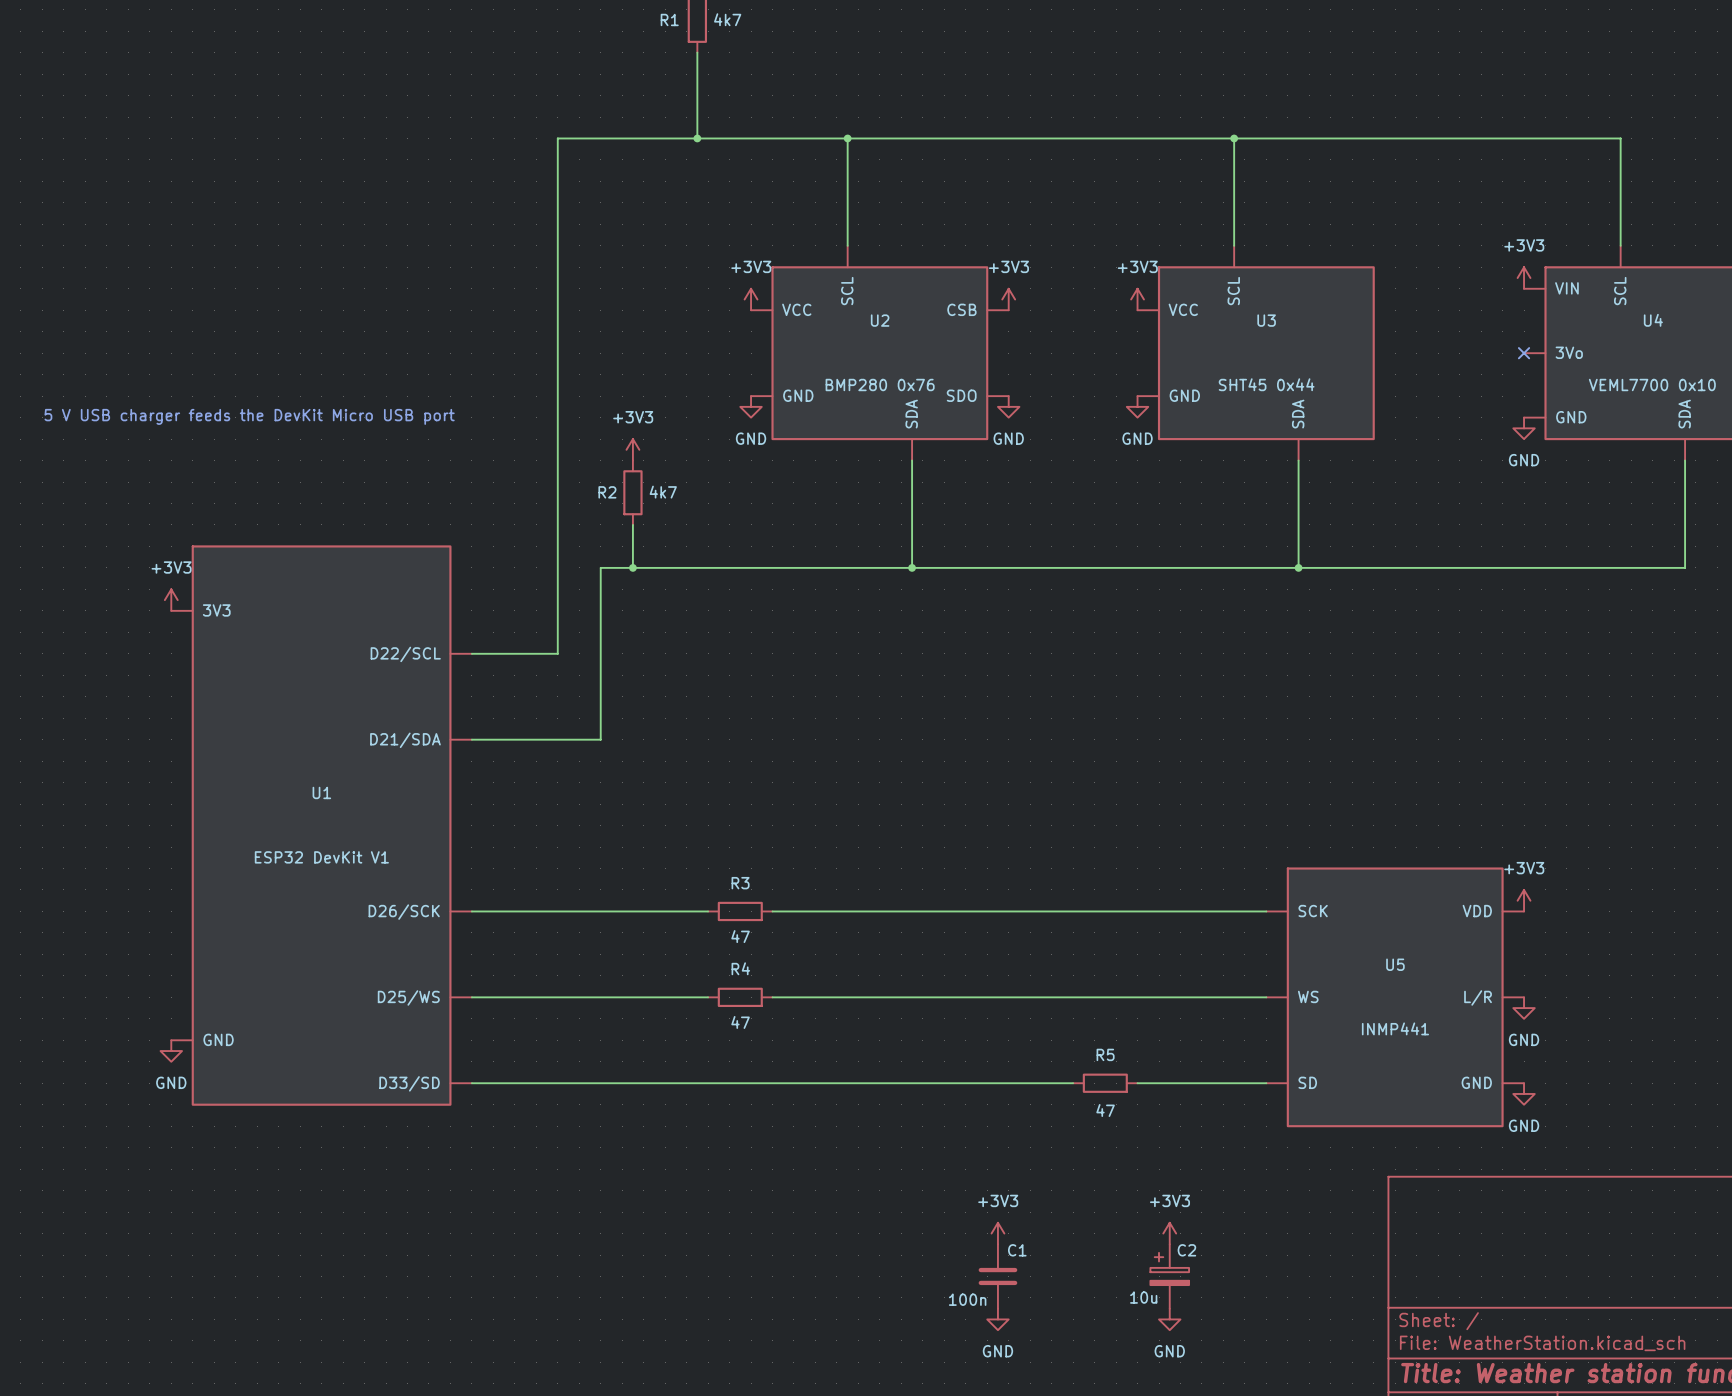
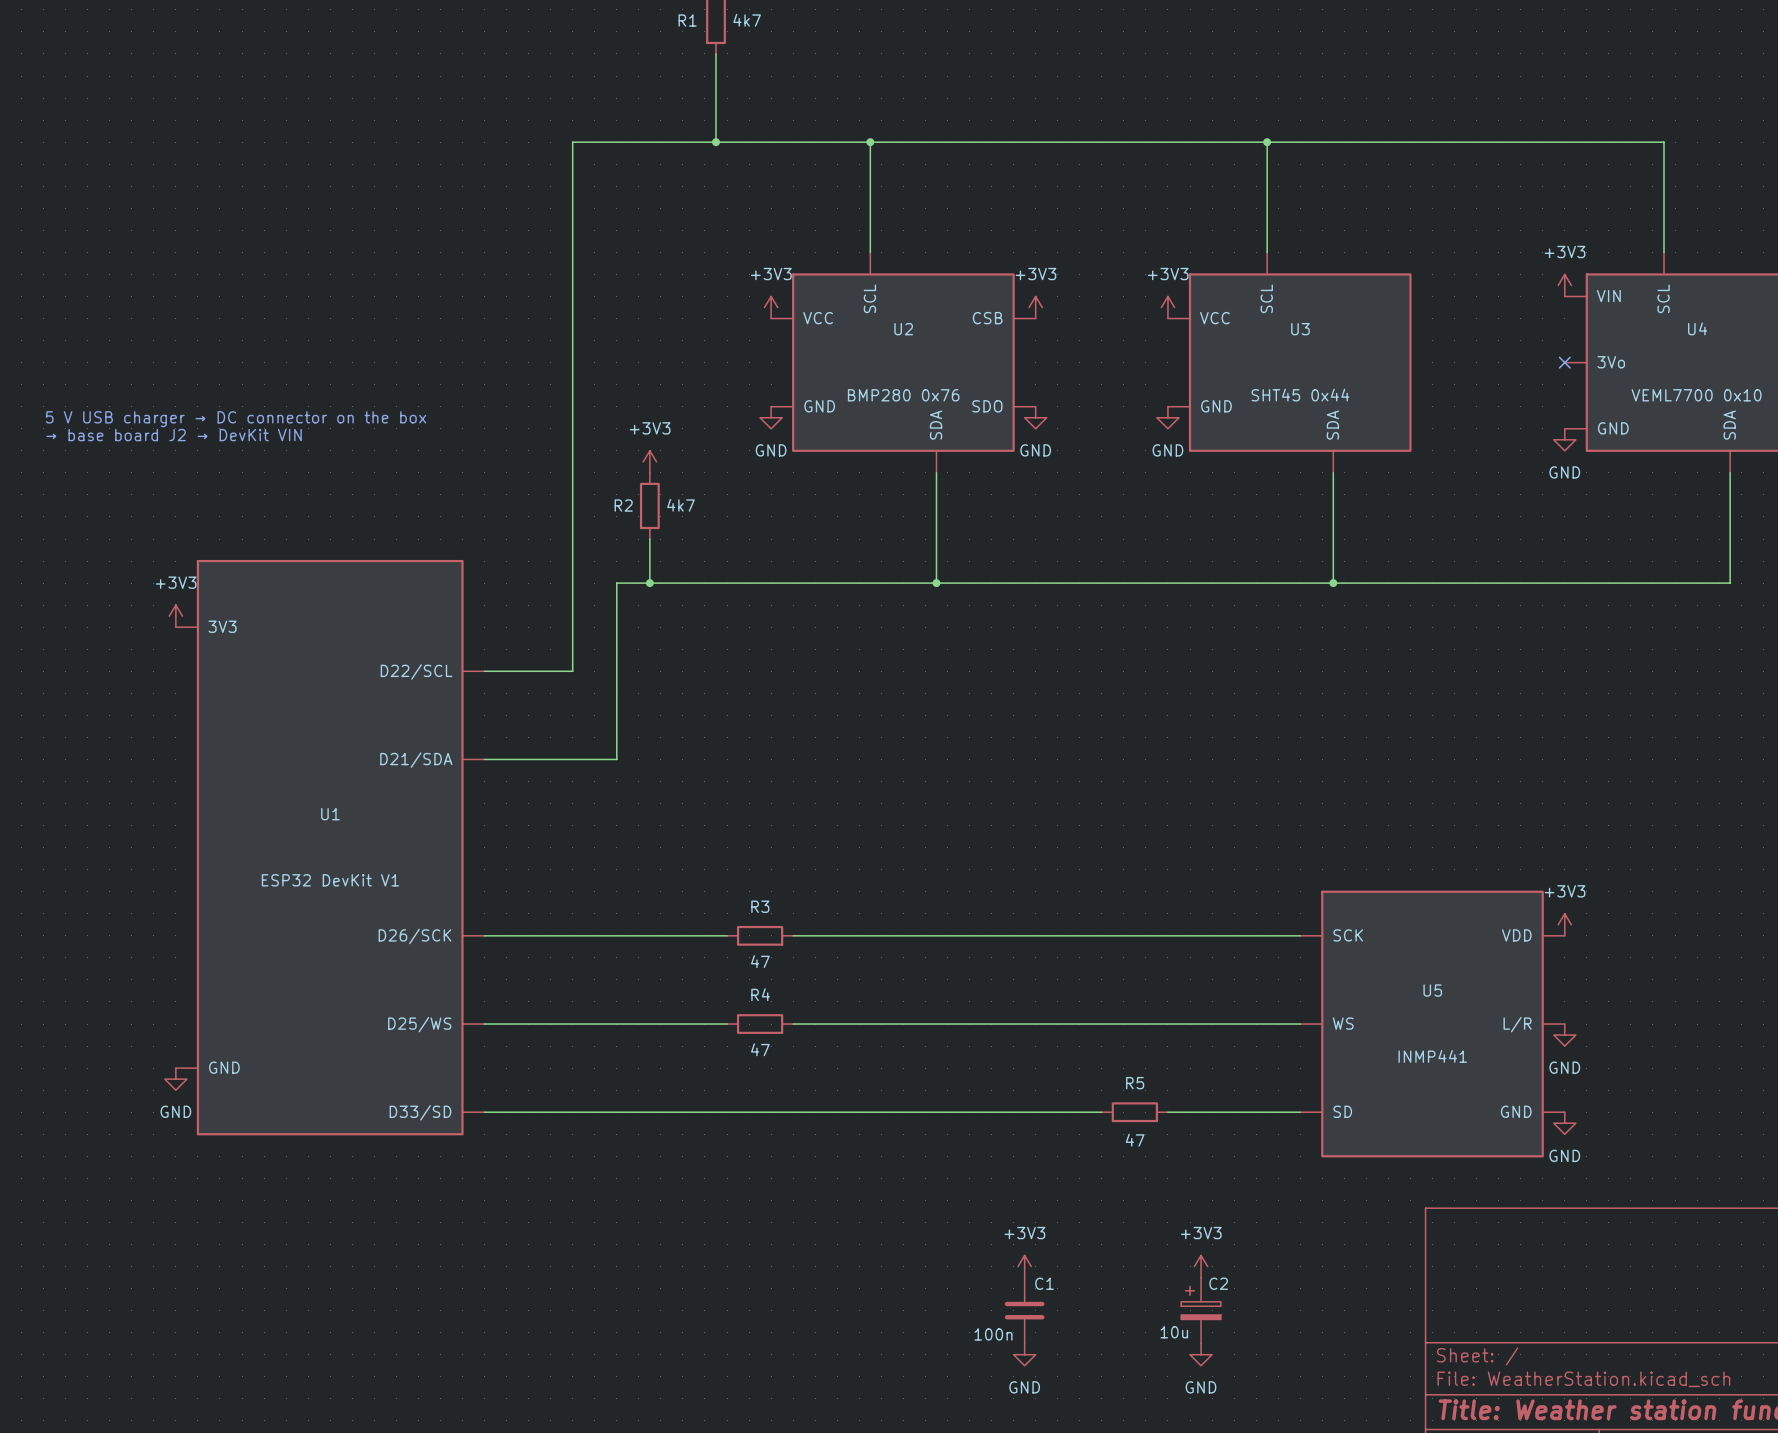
text: none -> 5 V USB charger → DC connector on the box (236, 419)
text: 5 V USB charger feeds the DevKit Micro USB port (249, 416) -> none
text: none -> → base board J2 → DevKit VIN (174, 435)

